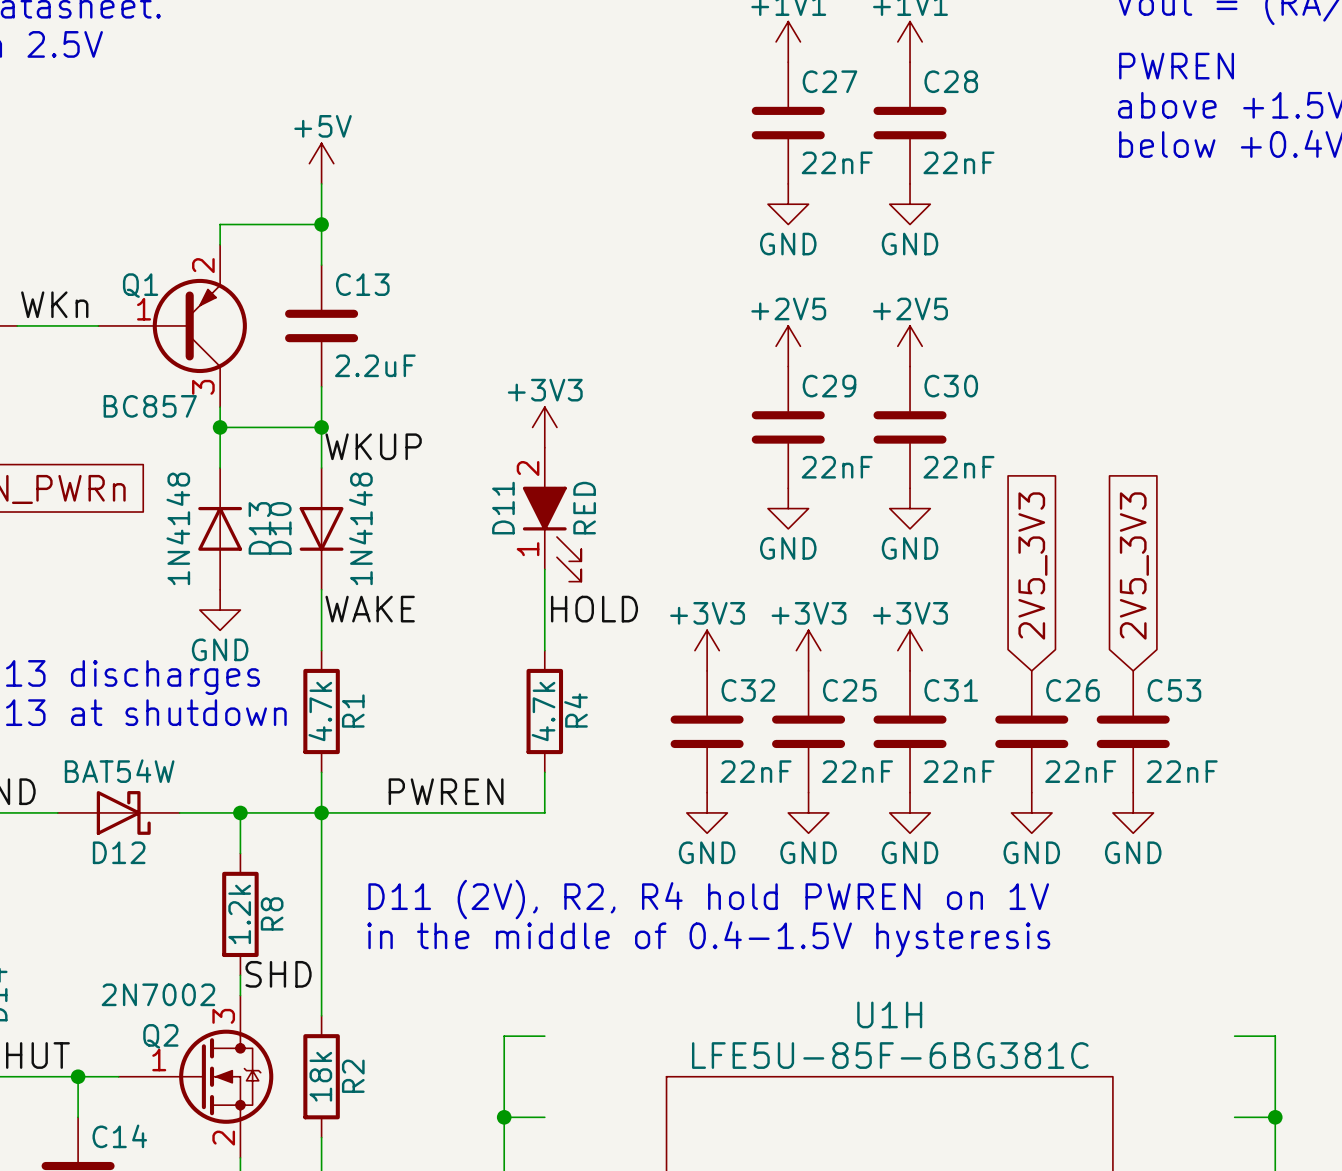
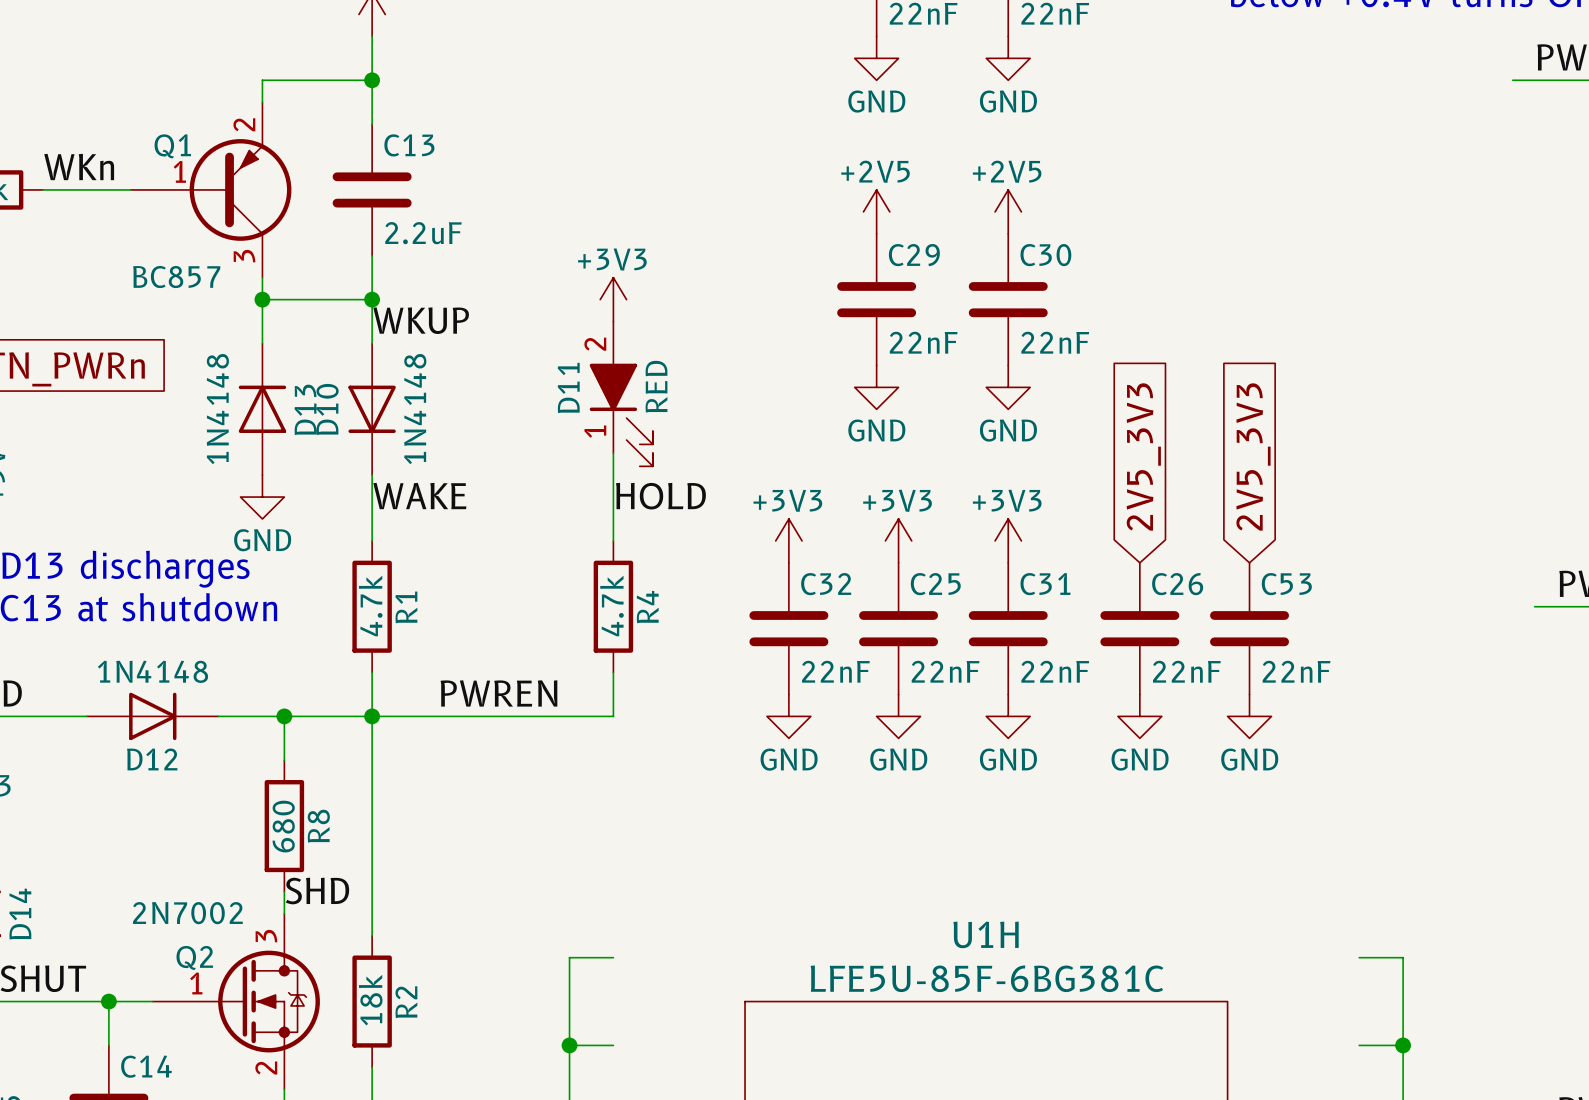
D12 value: BAT54W (119, 771) -> 1N4148 (152, 671)
D12 symbol: [57, 791, 180, 835] -> [86, 692, 219, 741]
text: D11 (2V), R2, R4 hold PWREN on 1V (708, 899) -> none
R8 value: 1.2k (239, 914) -> 680 (283, 826)
text: in the middle of 0.4-1.5V hysteresis (708, 939) -> none

